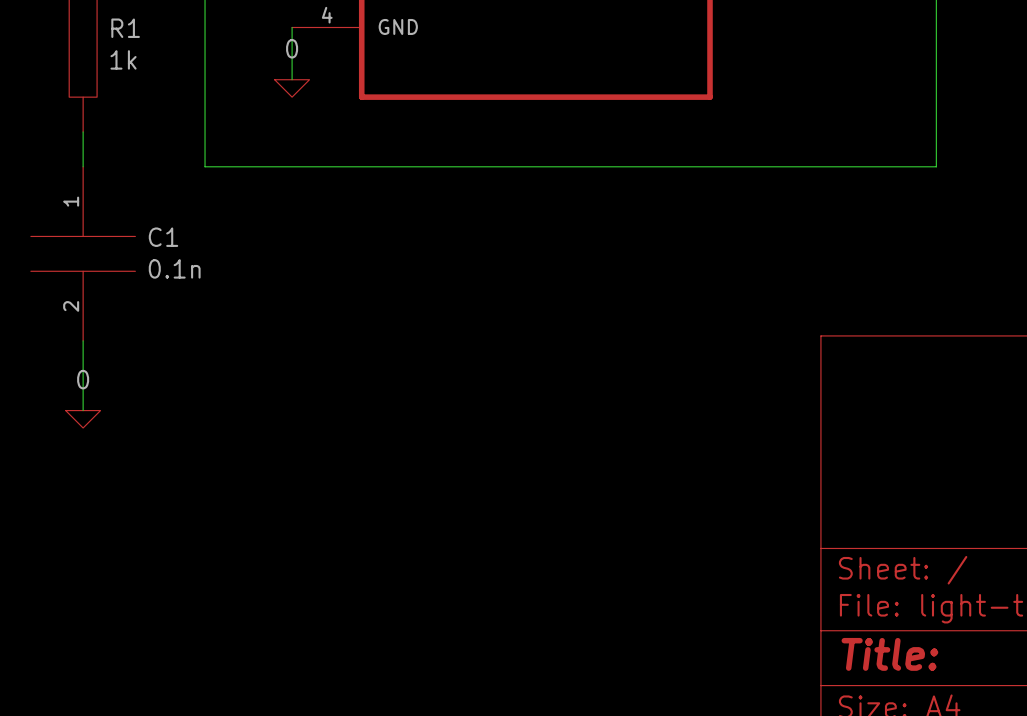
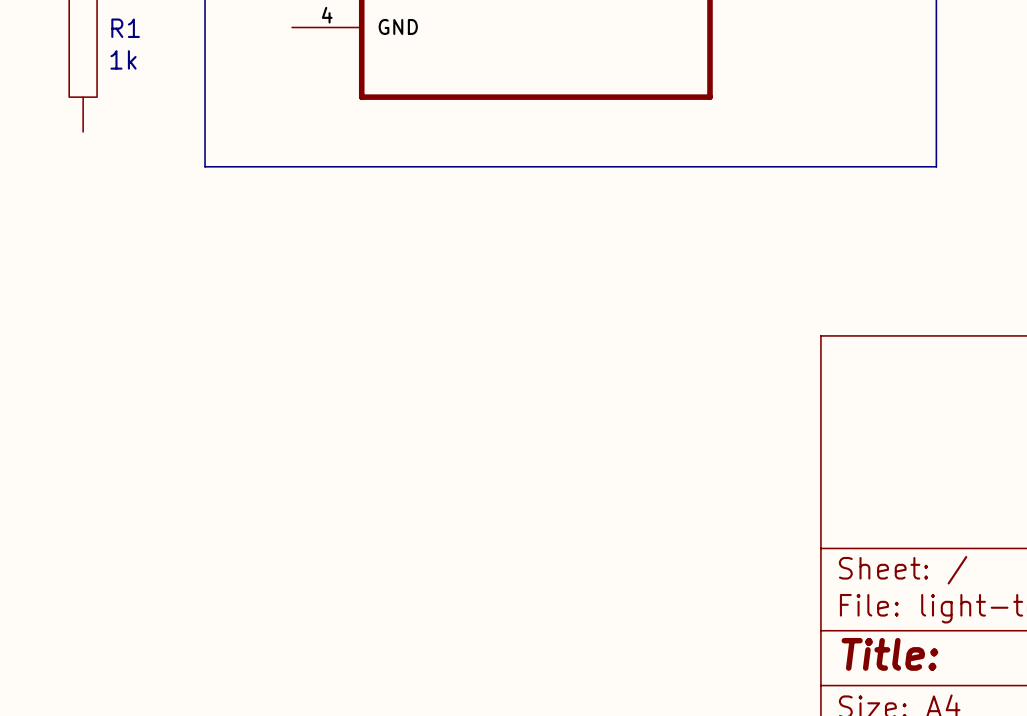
wire: (292, 27) (292, 79) -> none
power symbol: 0 (292, 88) -> none
wire: (83, 131) (83, 166) -> none
C1: 0.1n (83, 253) -> none
wire: (83, 340) (83, 410) -> none
power symbol: 0 (83, 419) -> none

